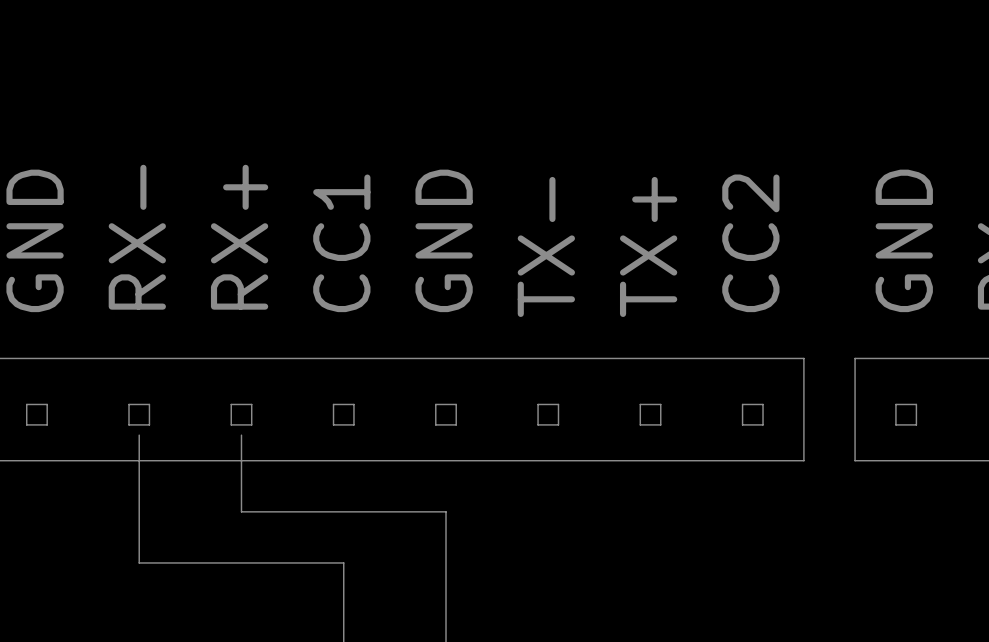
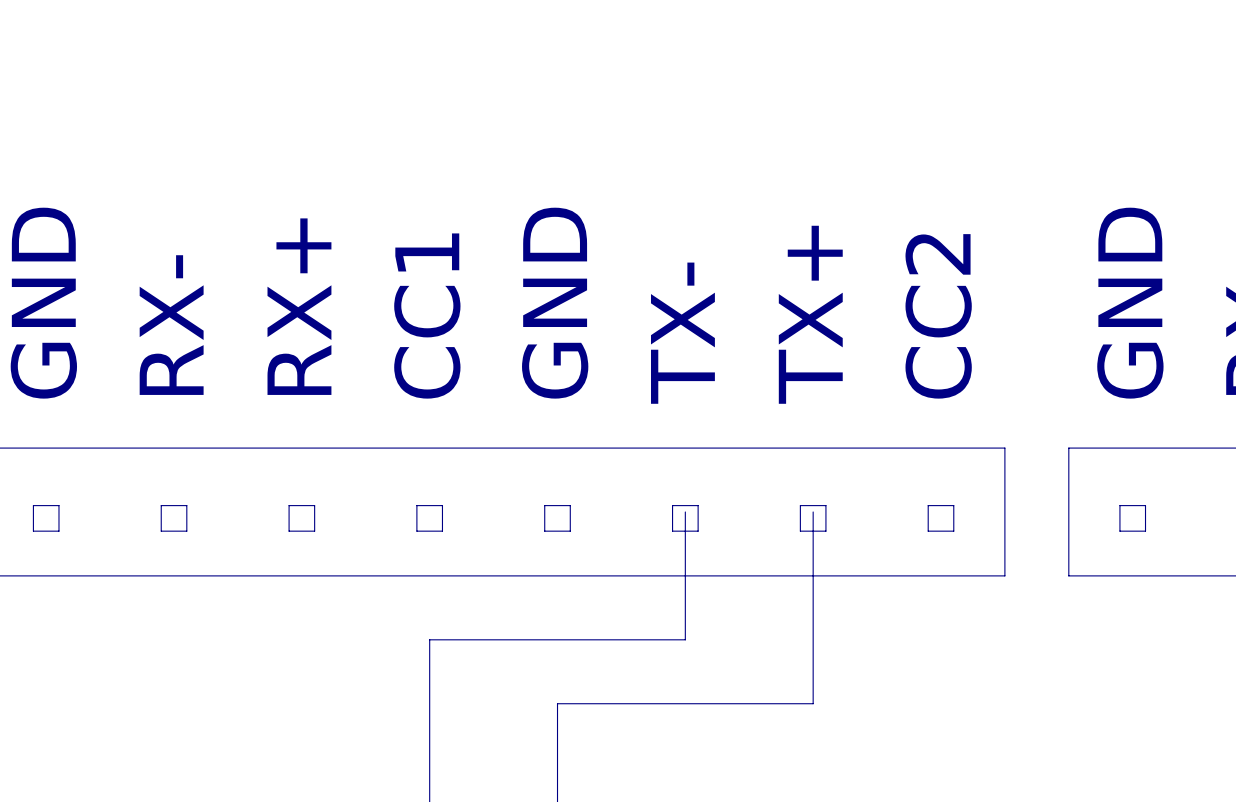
line: none -> (813, 511) (813, 703) (557, 703)
line: (139, 435) (139, 562) (343, 562) -> none
line: (241, 435) (241, 511) (343, 511) -> (429, 703) (429, 639)
line: (446, 511) (446, 562) -> (557, 639) (685, 639) (685, 511)

